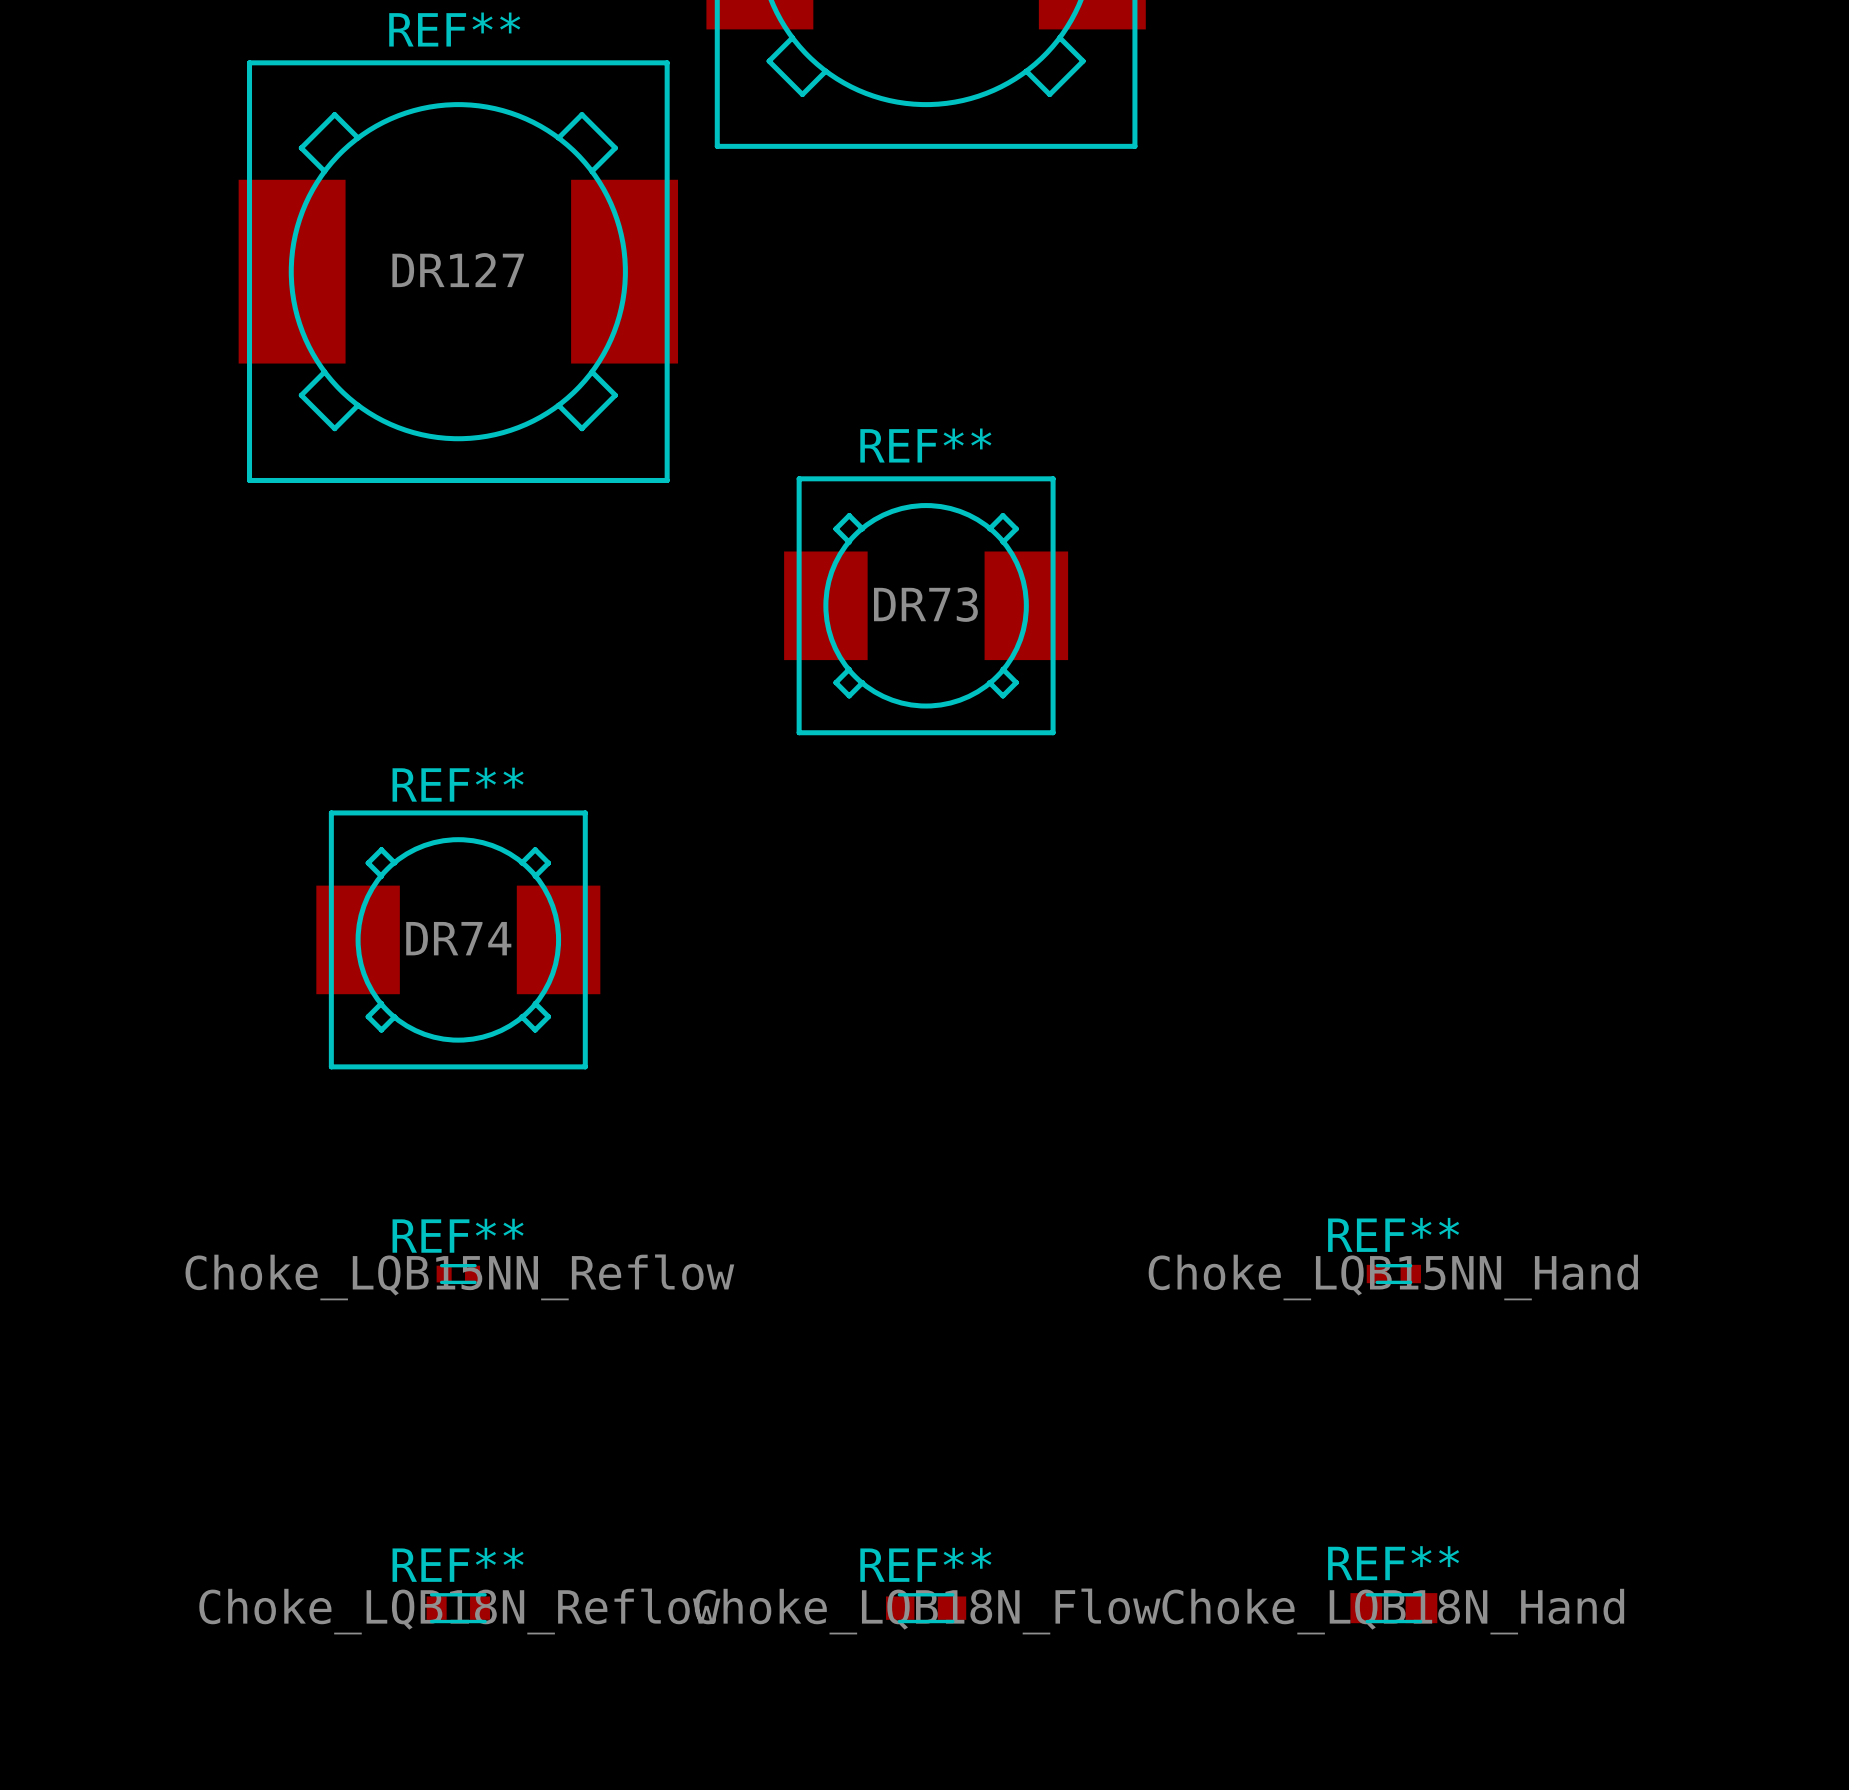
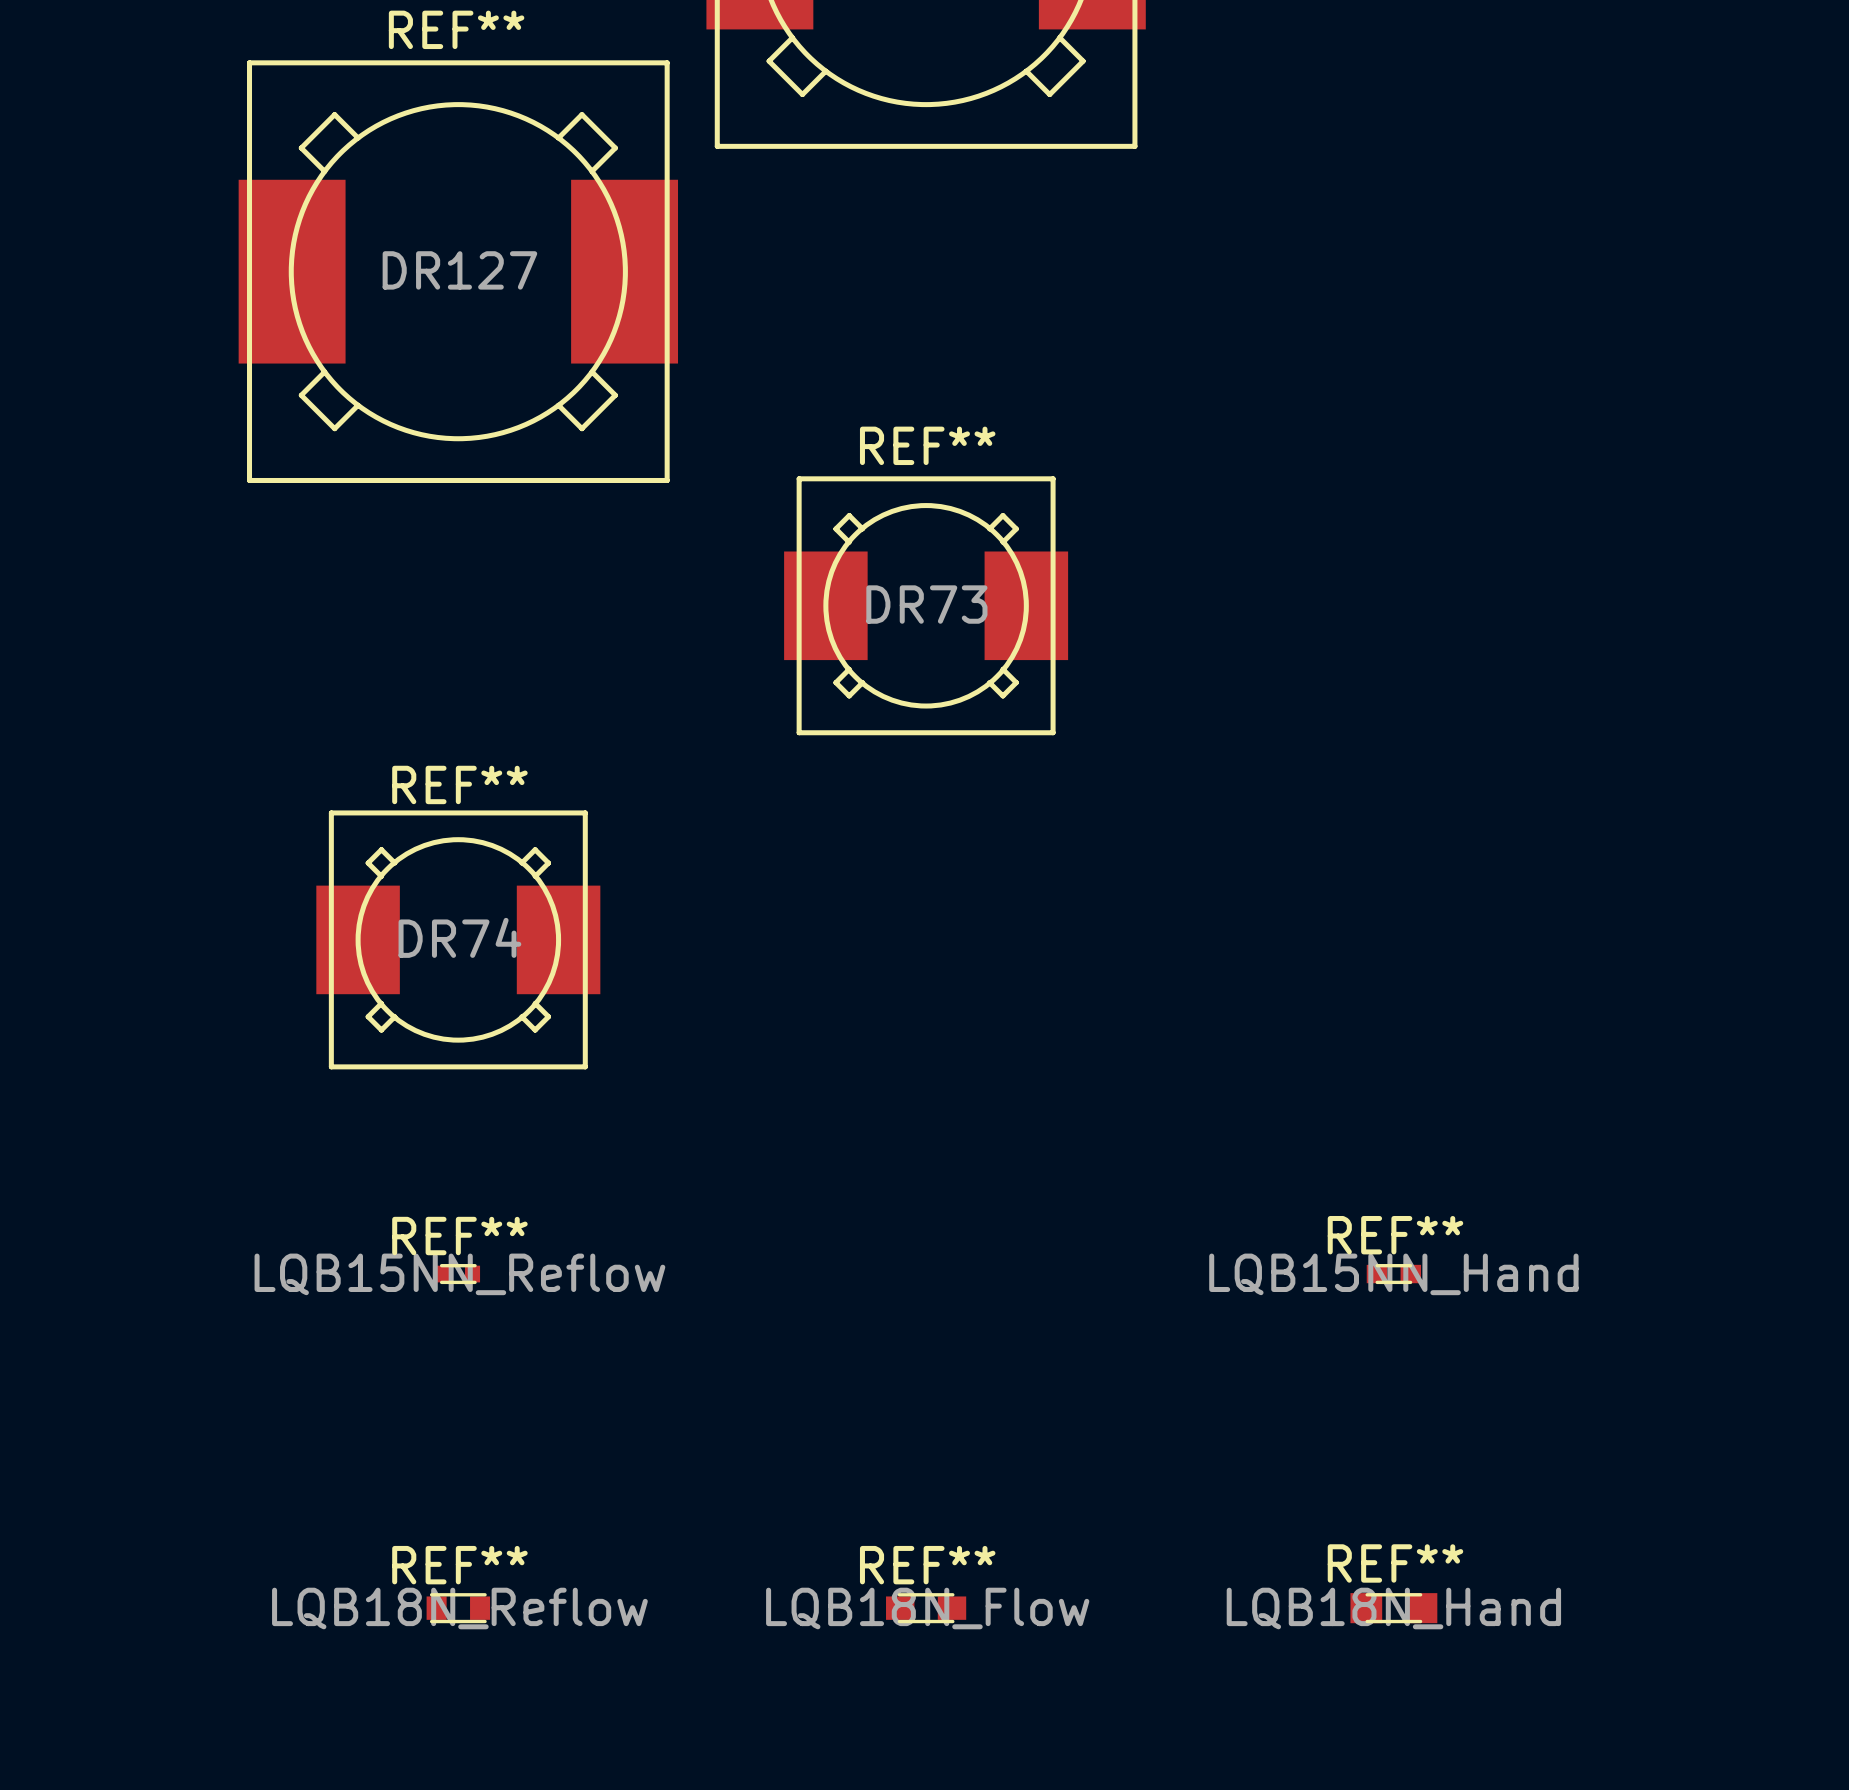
REF** value: Choke_LQB15NN_Reflow (459, 1277) -> LQB15NN_Reflow (459, 1274)
REF** value: Choke_LQB15NN_Hand (1393, 1277) -> LQB15NN_Hand (1393, 1274)
REF** value: Choke_LQB18N_Reflow (459, 1611) -> LQB18N_Reflow (459, 1608)
REF** value: Choke_LQB18N_Flow (927, 1611) -> LQB18N_Flow (927, 1608)
REF** value: Choke_LQB18N_Hand (1393, 1611) -> LQB18N_Hand (1393, 1608)

